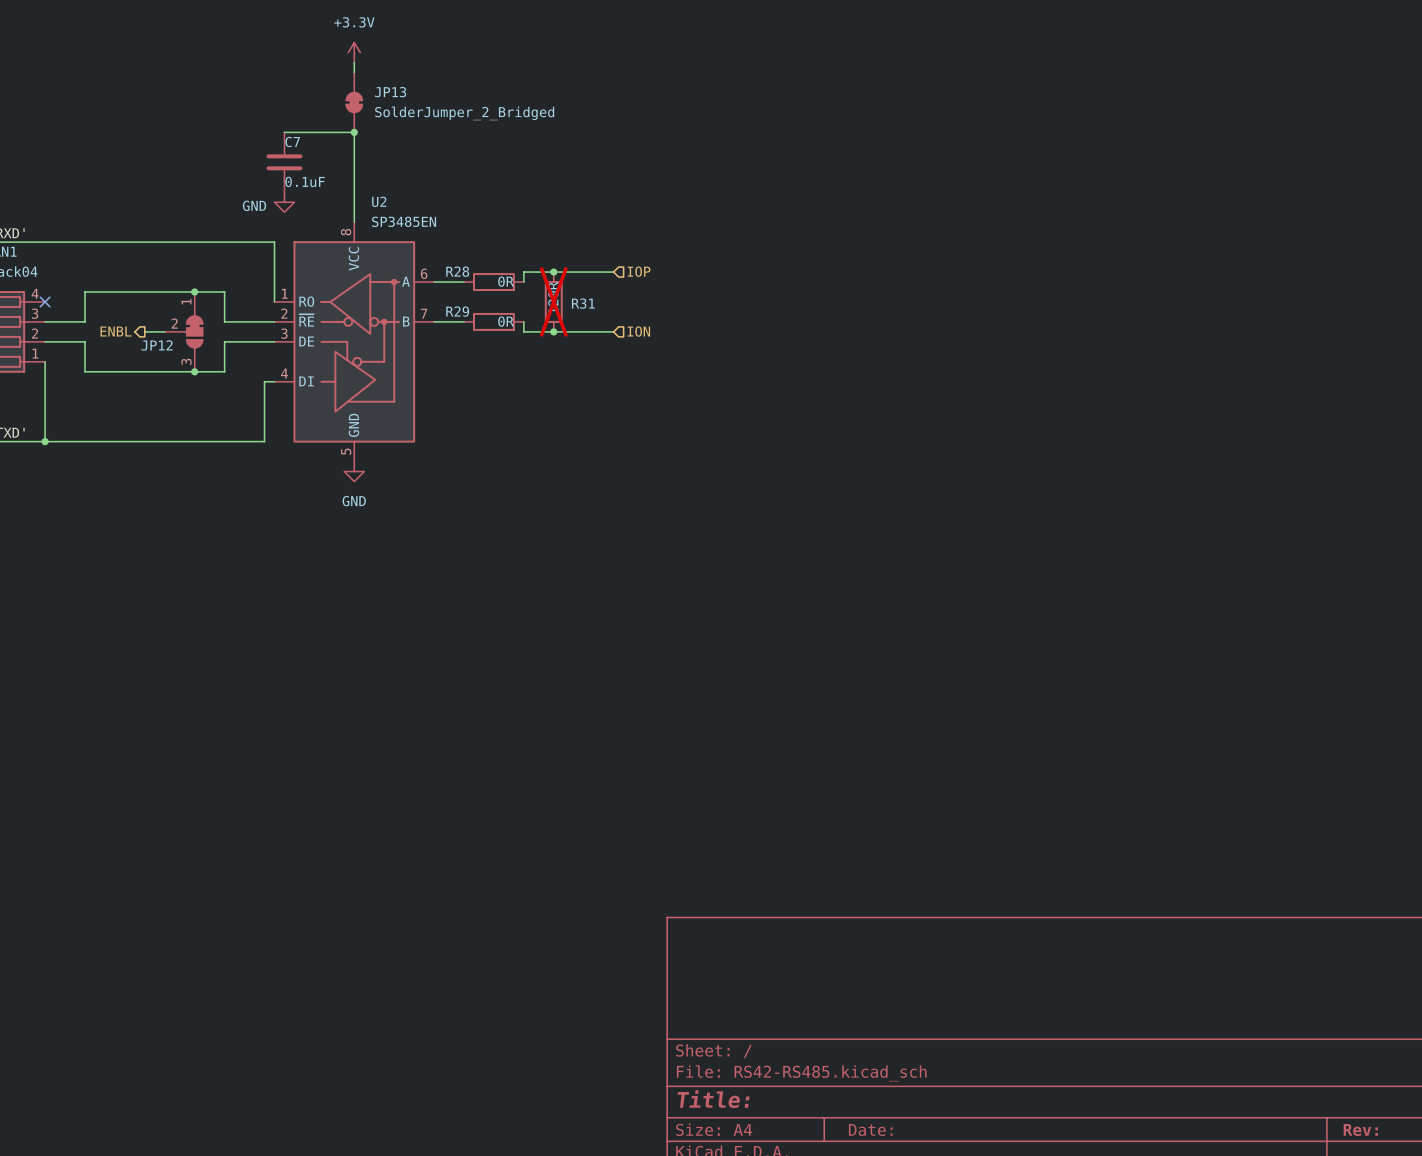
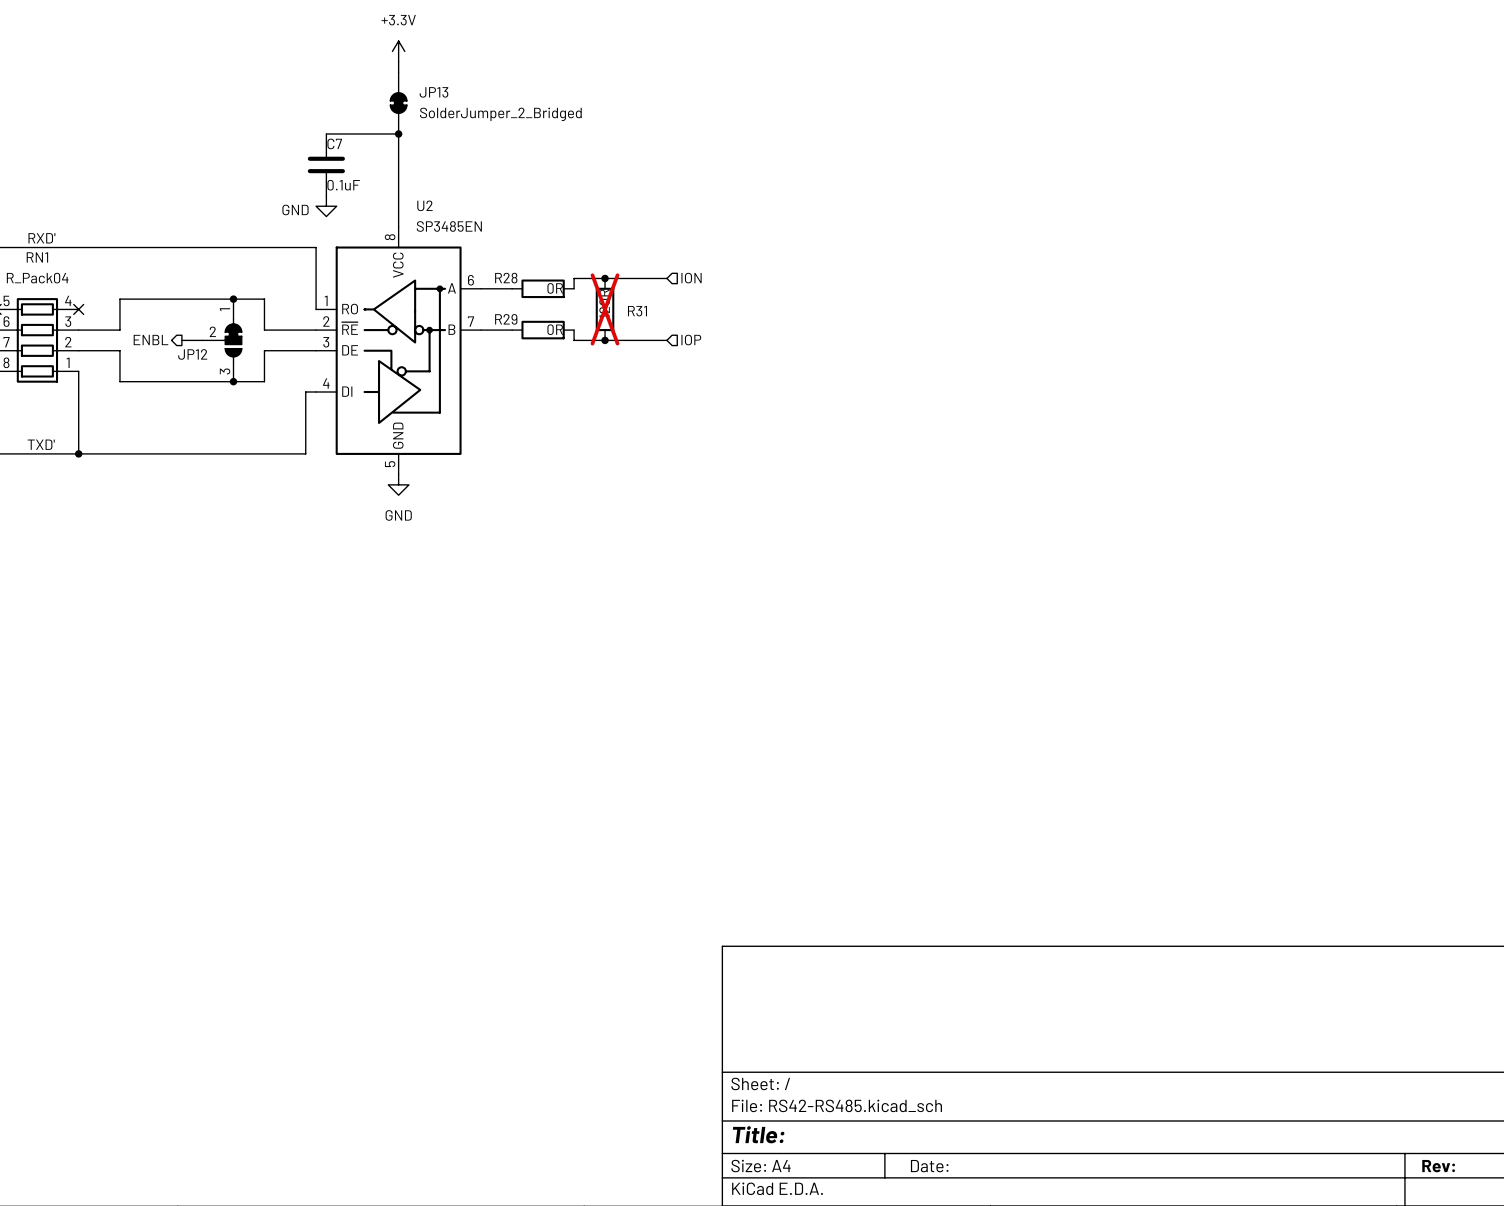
hierarchical label: IOP (639, 271) -> ION (691, 278)
hierarchical label: ION (638, 331) -> IOP (691, 340)

